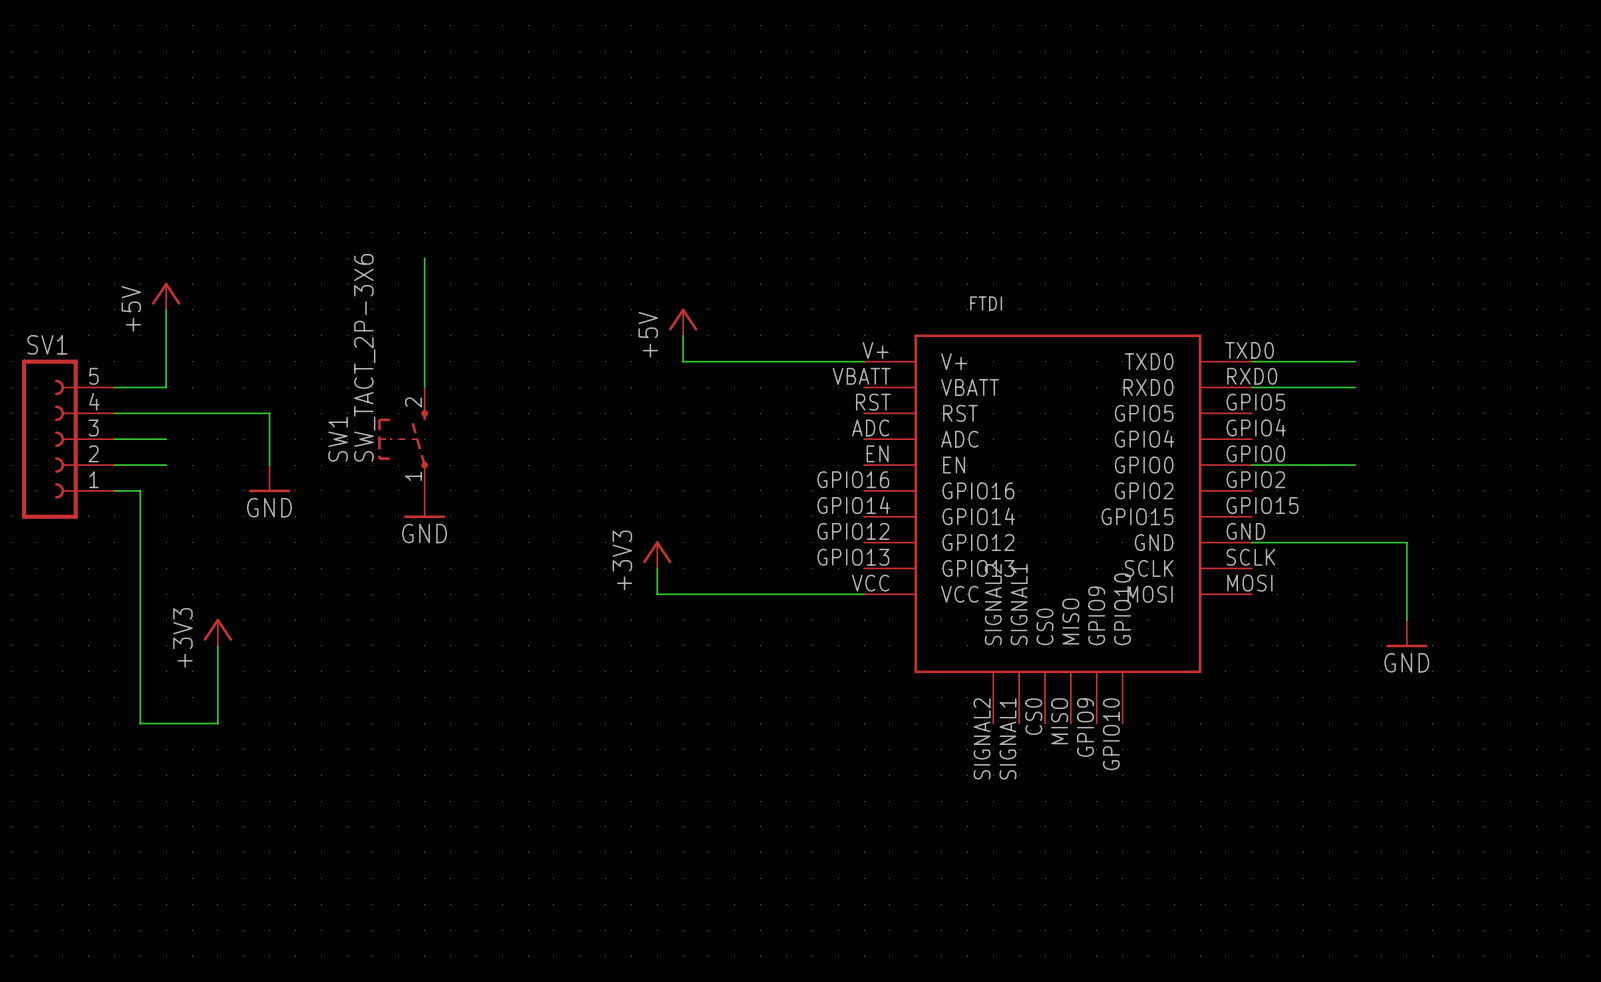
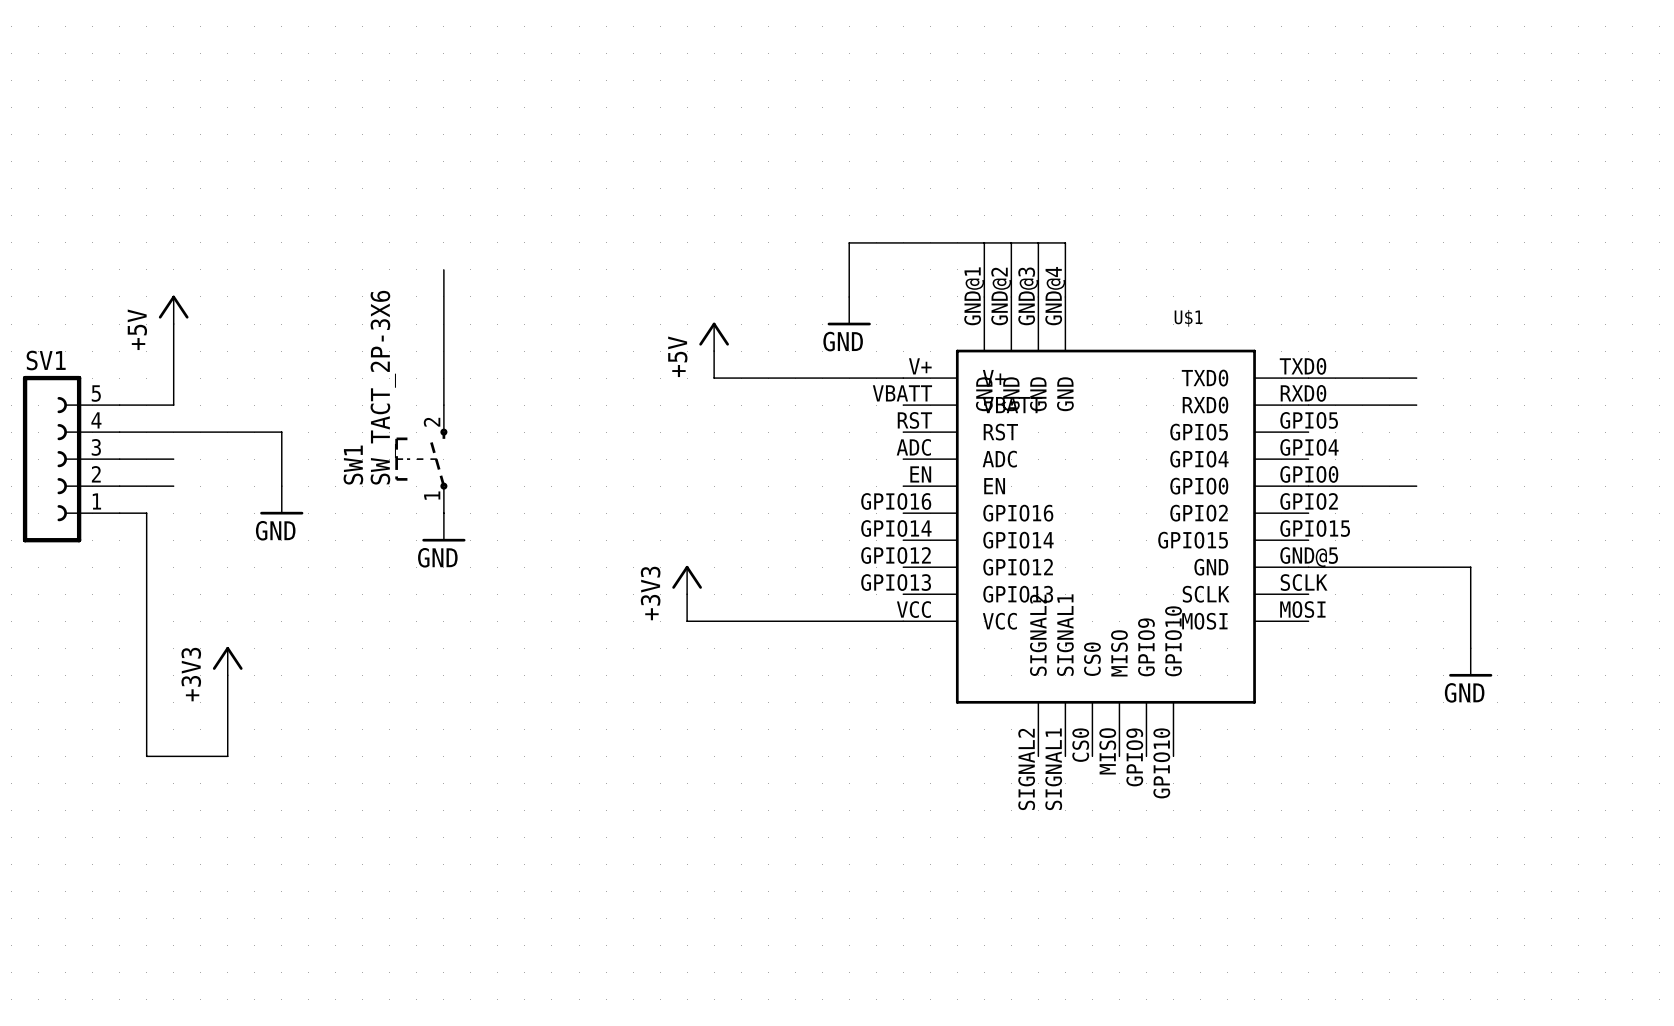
wire: none -> (984, 242) (984, 296)
wire: none -> (1011, 242) (1011, 296)
wire: none -> (1038, 242) (1038, 296)
wire: none -> (849, 296) (849, 242) (1065, 242) (1065, 296)
power symbol: none -> GND (849, 311)
U$1: none -> (1105, 526)
FTDI: (1057, 529) -> none

